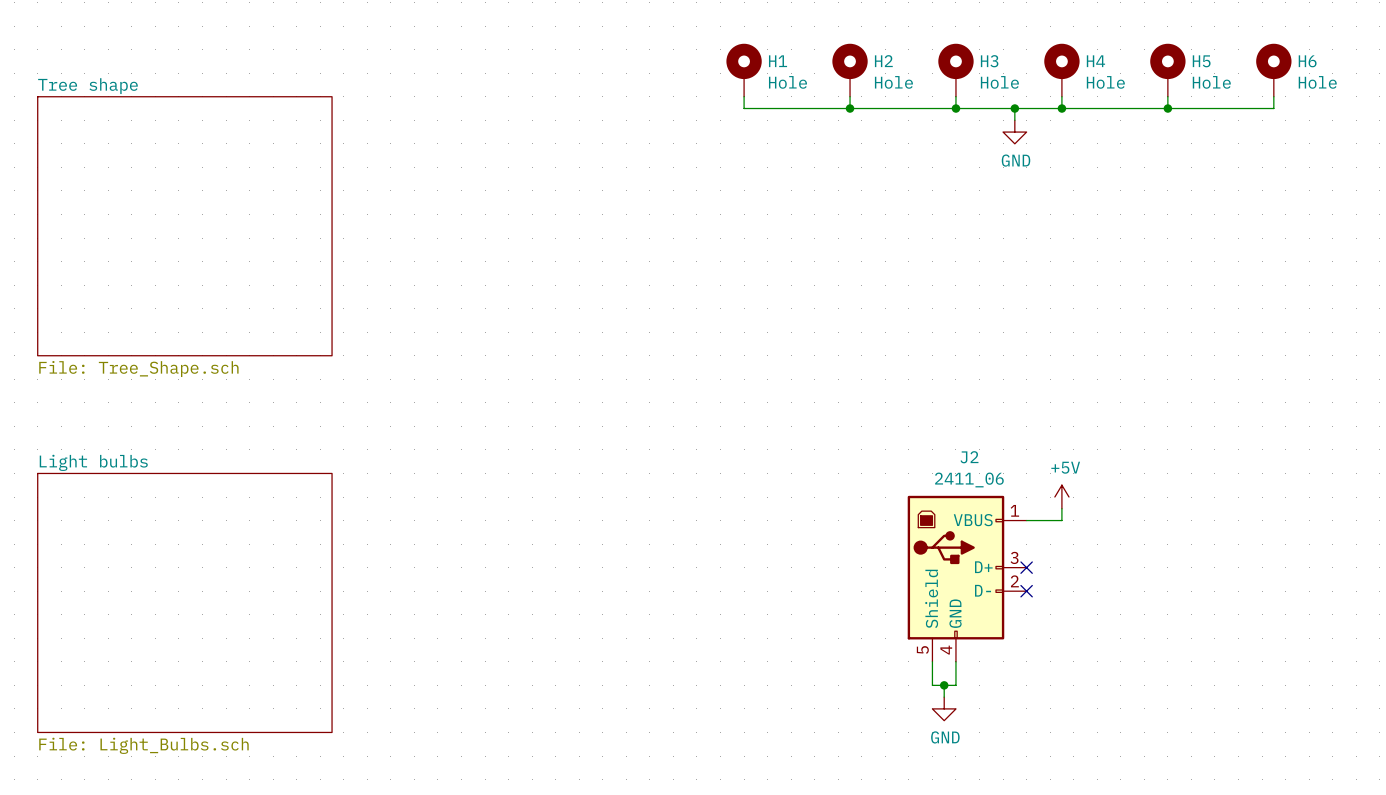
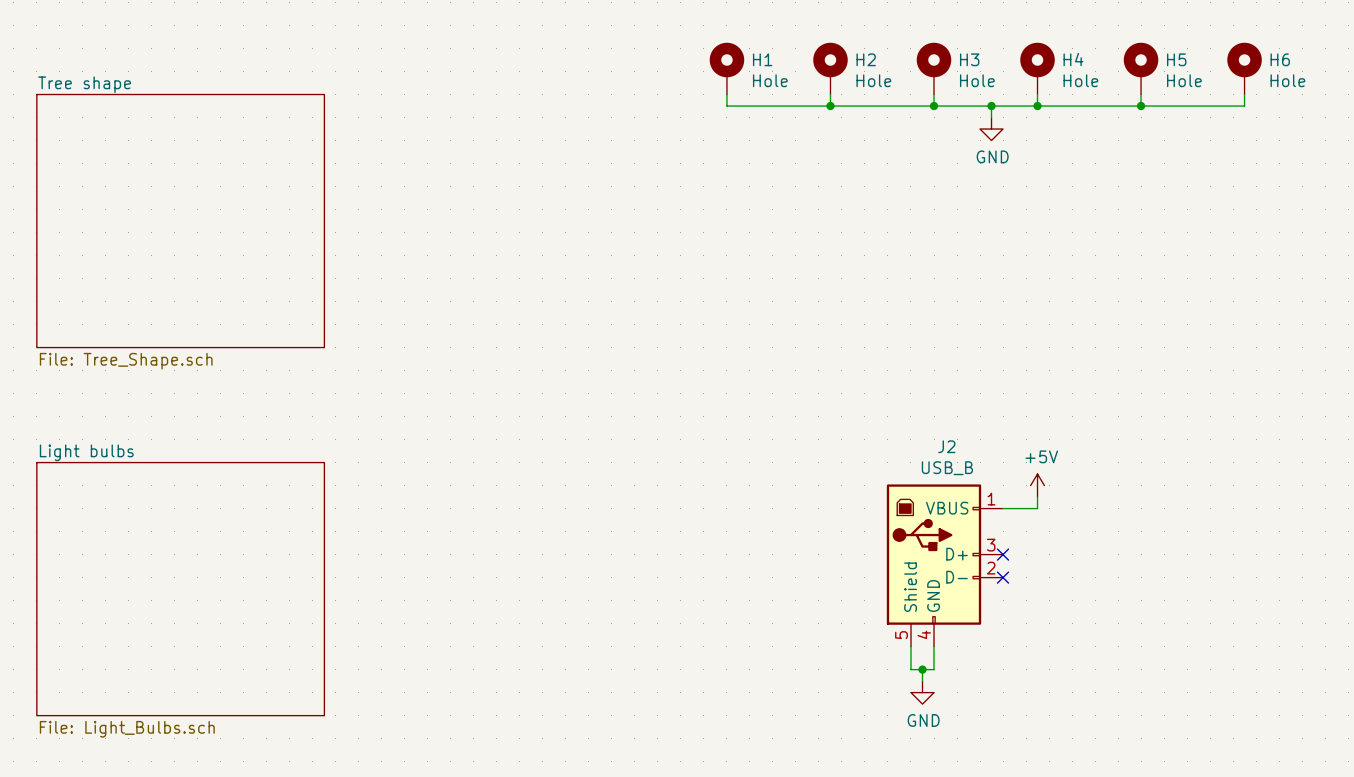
J2 value: 2411_06 (969, 480) -> USB_B (947, 468)

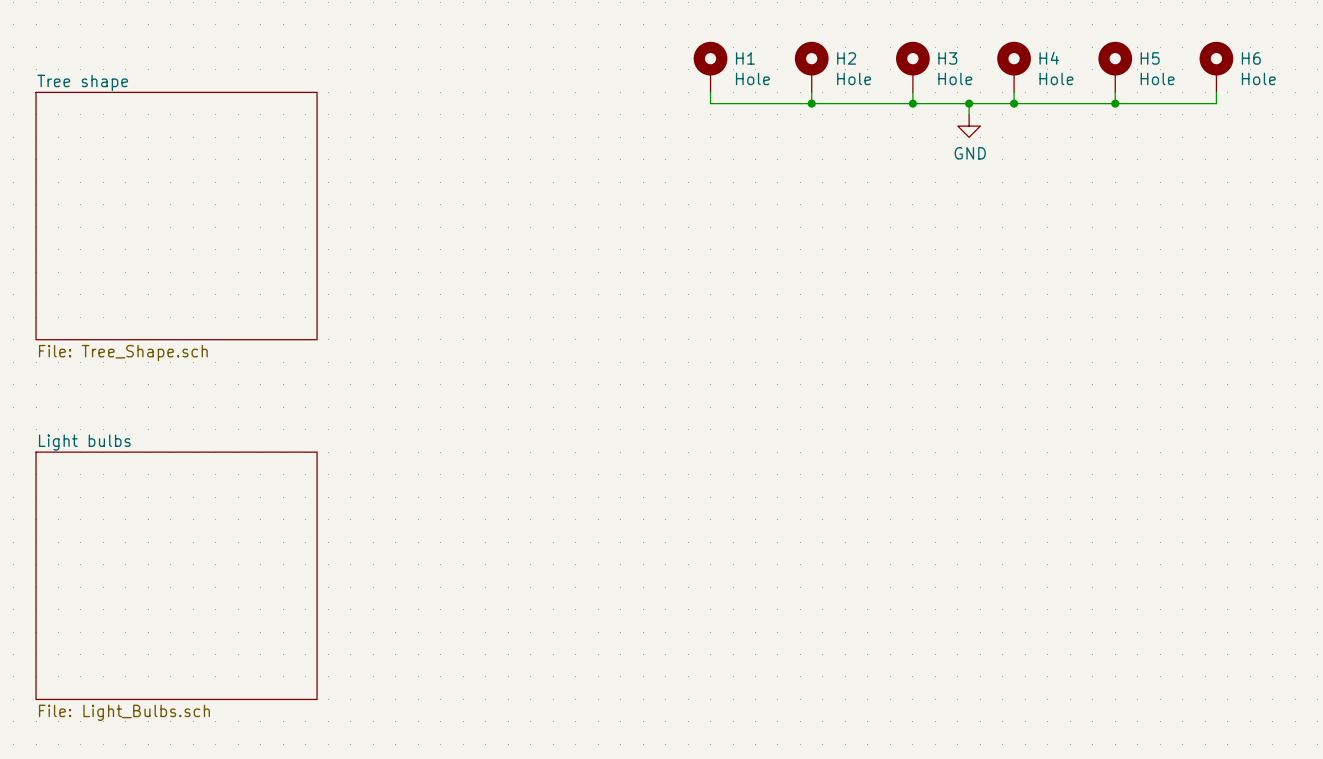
power symbol: +5V (1037, 485) -> none
wire: (1037, 497) (1037, 508) (1003, 508) -> none
no-connect mark: (1003, 554) -> none
J2: USB_B (944, 565) -> none
no-connect mark: (1003, 577) -> none
wire: (910, 646) (910, 669) (934, 669) (934, 646) -> none
wire: (922, 669) (922, 681) -> none
junction: (922, 669) -> none
power symbol: GND (922, 692) -> none

